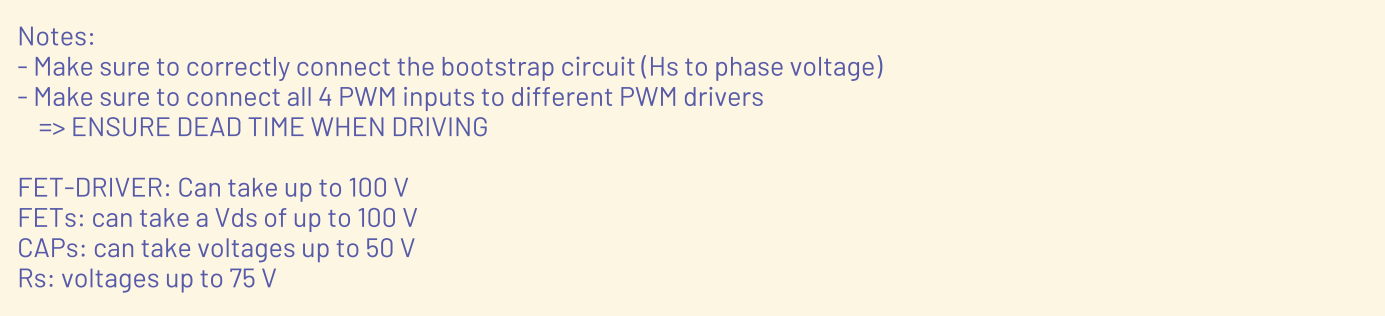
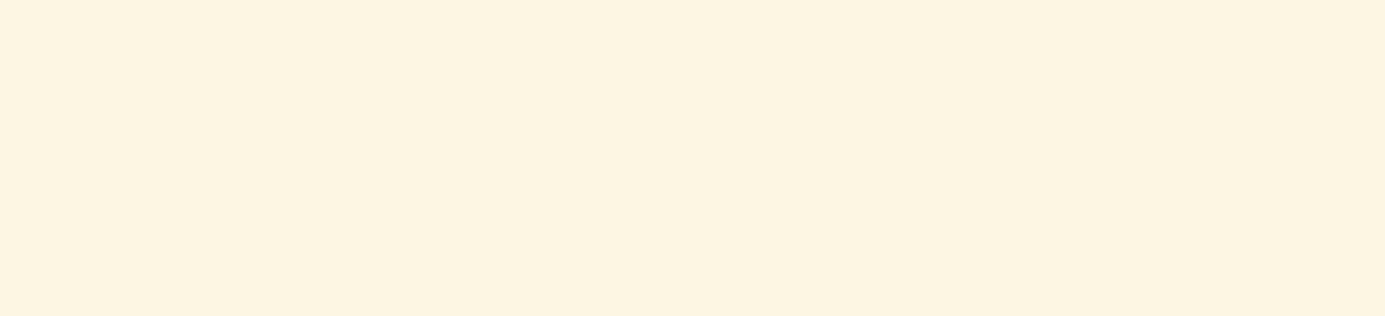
text: Notes: (56, 36) -> none
text: - Make sure to correctly connect the bootstrap circuit (Hs to phase voltage) (450, 68) -> none
text: - Make sure to connect all 4 PWM inputs to different PWM drivers (390, 98) -> none
text: => ENSURE DEAD TIME WHEN DRIVING (263, 126) -> none
text: FET-DRIVER: Can take up to 100 V (213, 189) -> none
text: FETs: can take a Vds of up to 100 V (218, 219) -> none
text: CAPs: can take voltages up to 50 V (216, 250) -> none
text: Rs: voltages up to 75 V (147, 280) -> none

